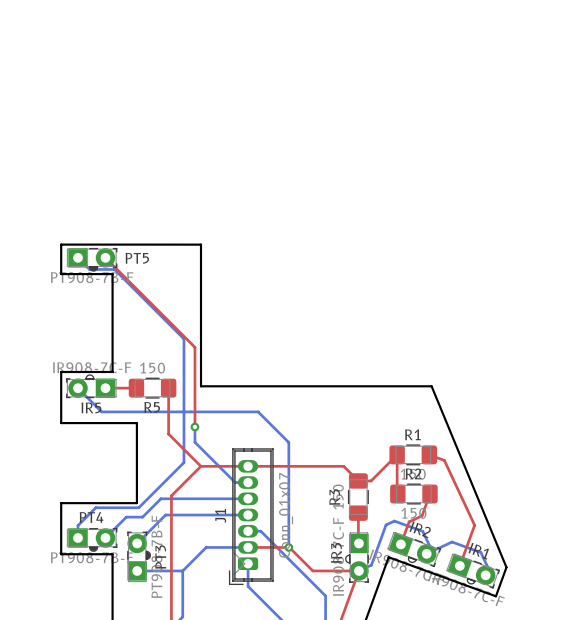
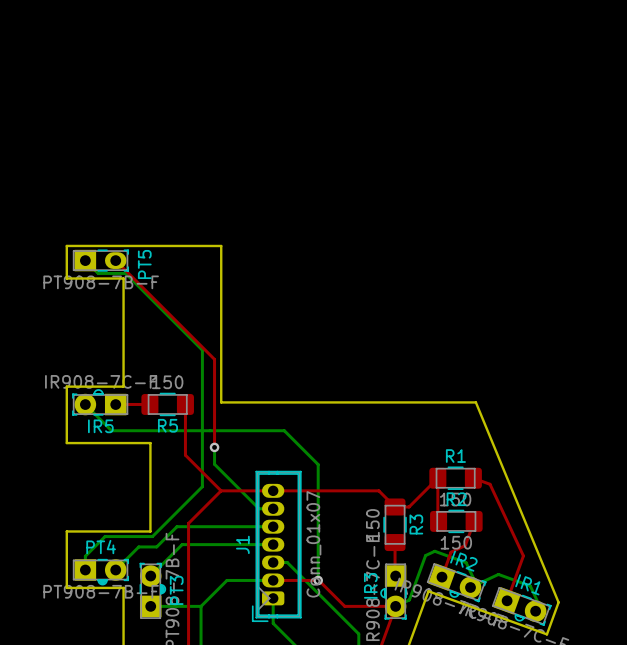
PT5 footprint: [66, 247, 118, 272] -> [73, 249, 129, 272]
R3 name position: R3 (334, 497) -> R3 (416, 524)

